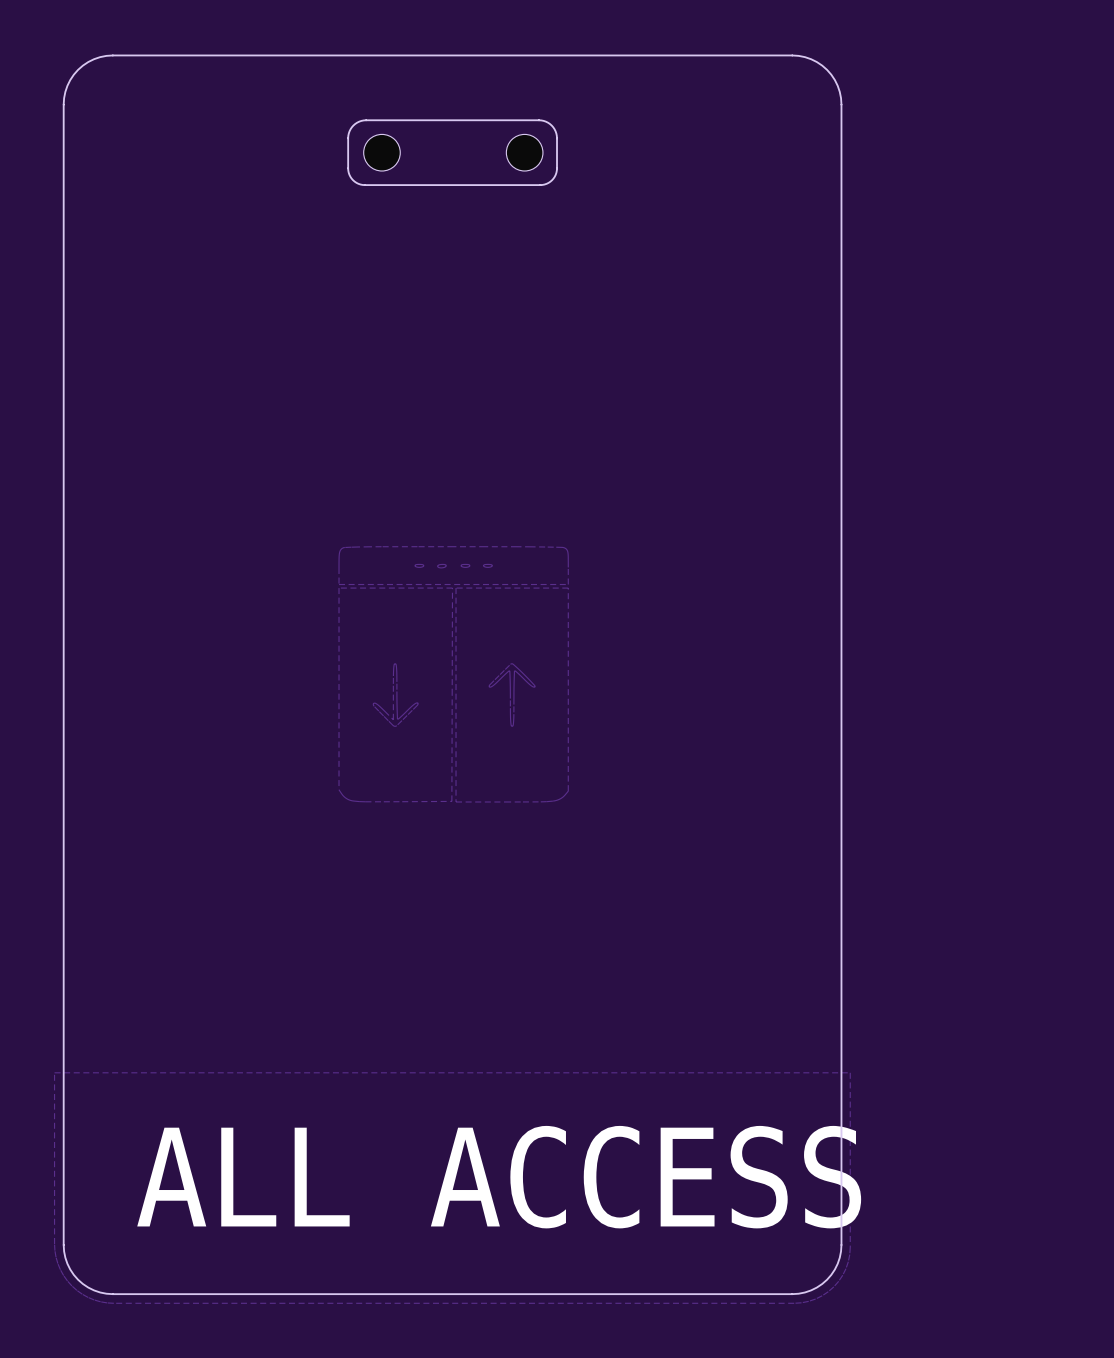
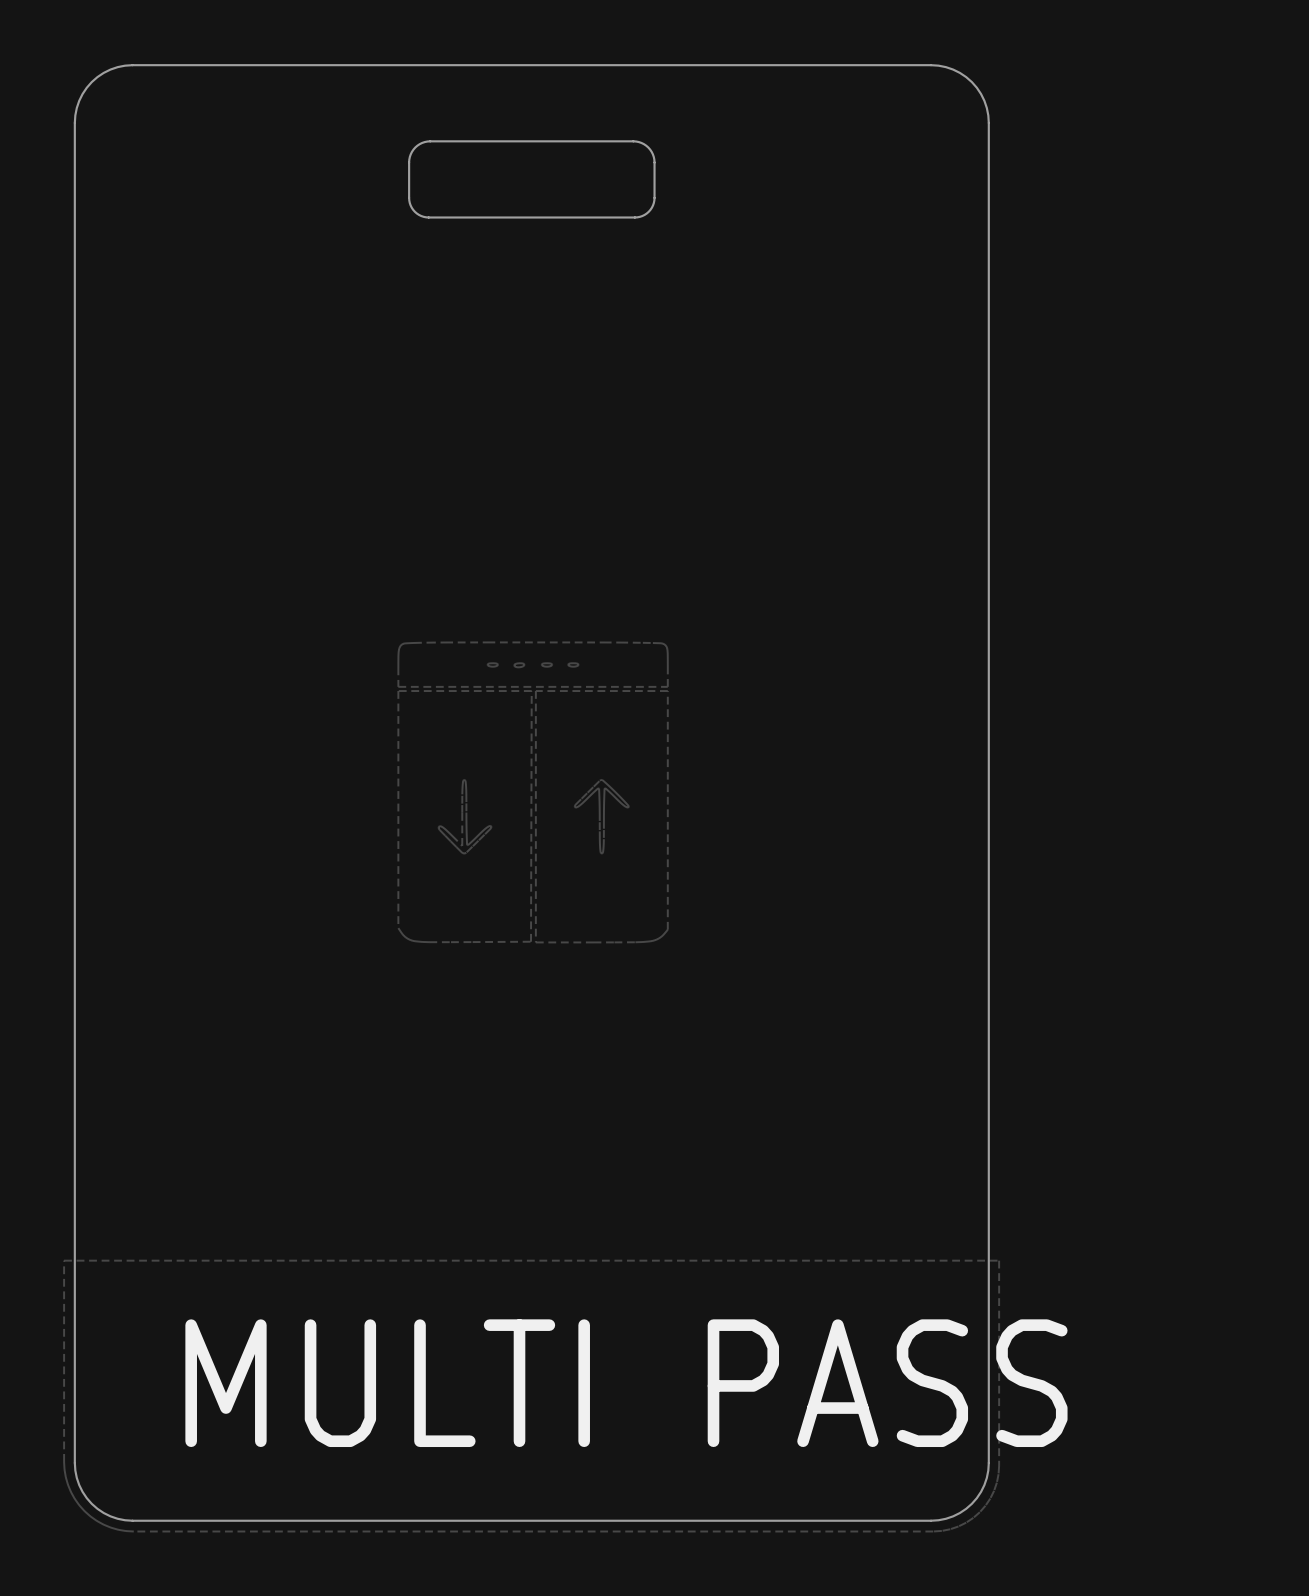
hole: (381, 152) -> none
hole: (524, 152) -> none
text: ALL ACCESS (499, 1177) -> MULTI PASS (626, 1383)

